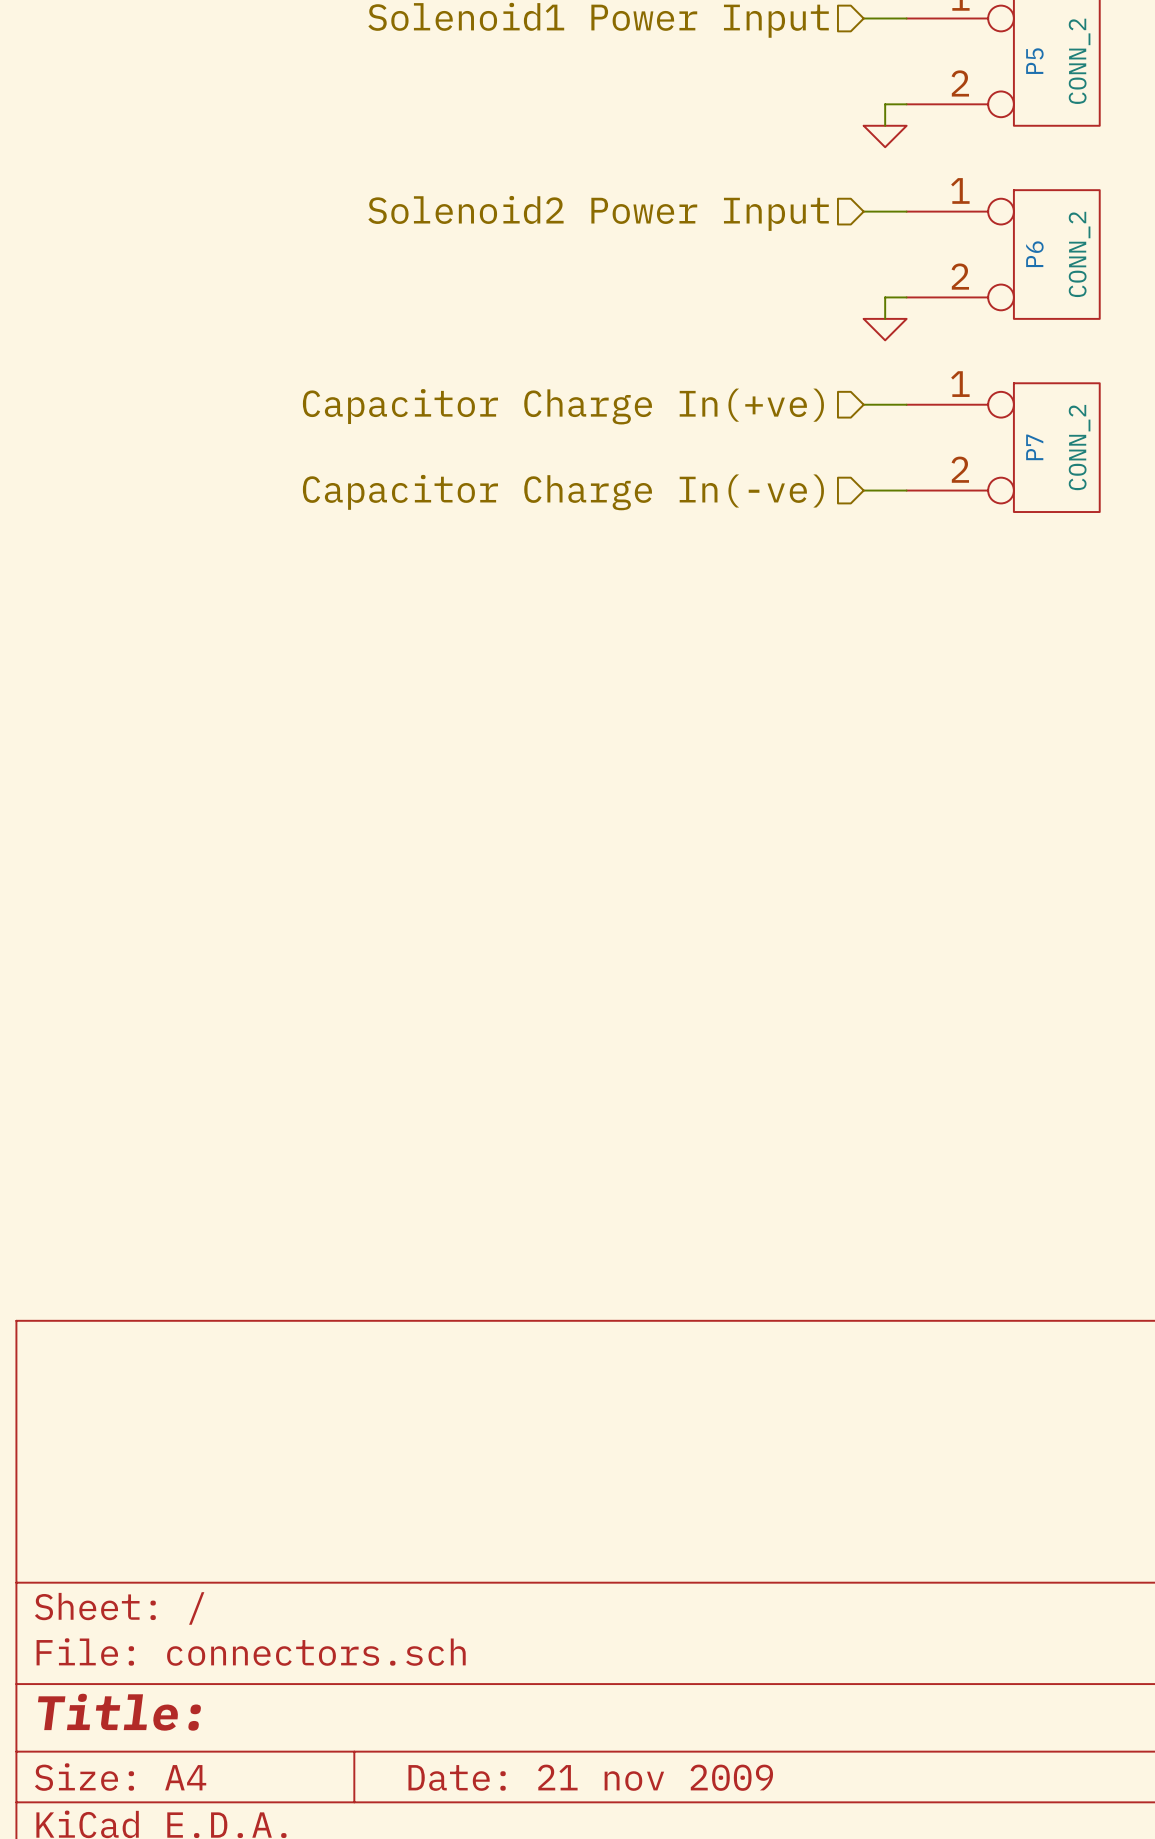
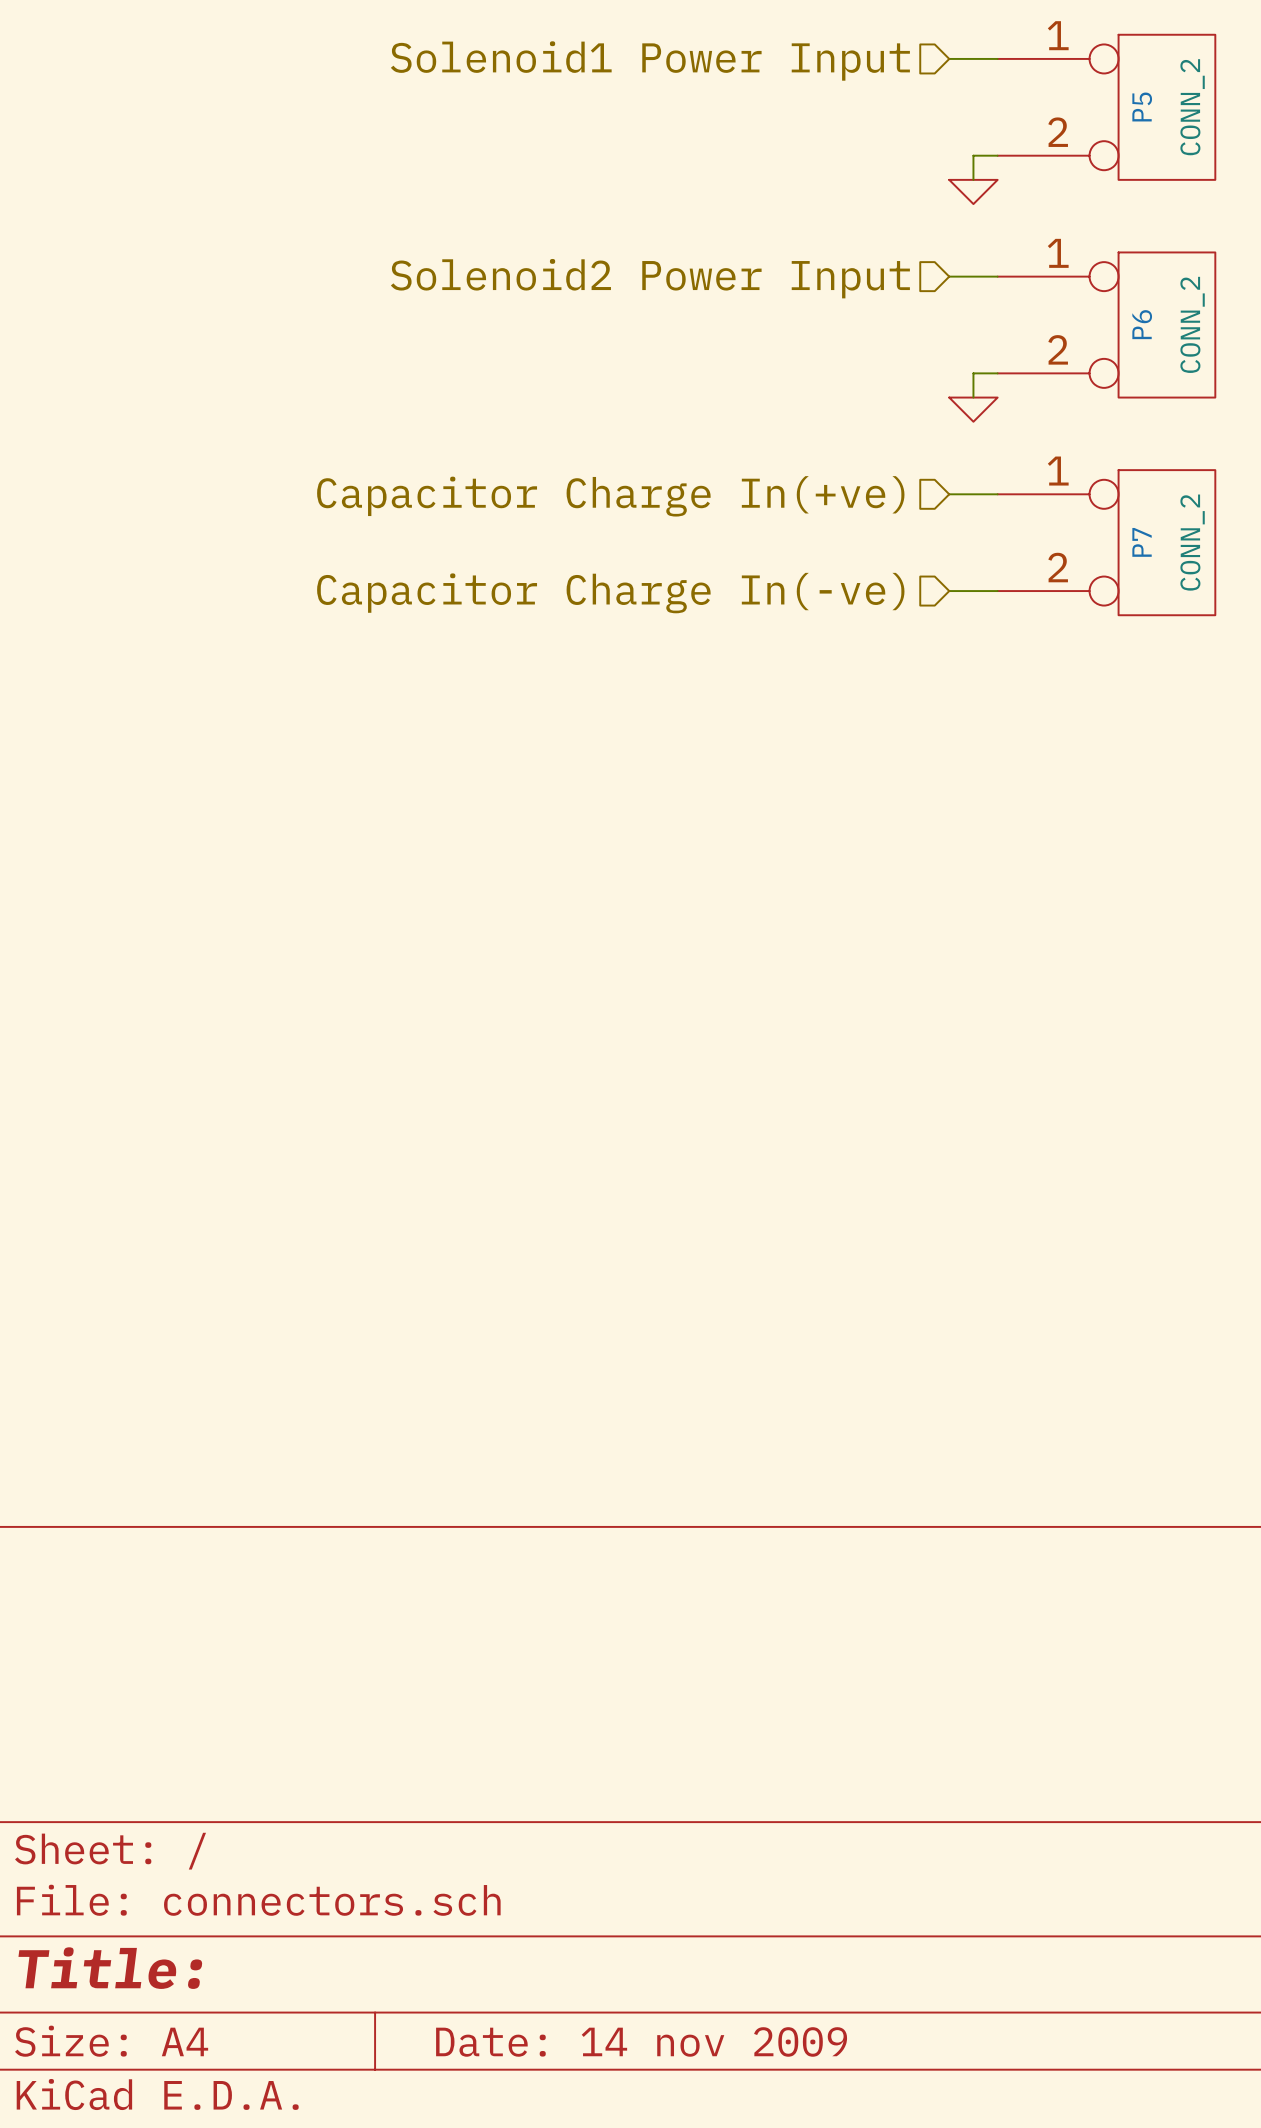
title block: Date: 21 nov 2009 (590, 1777) -> Date: 14 nov 2009 (641, 2041)

